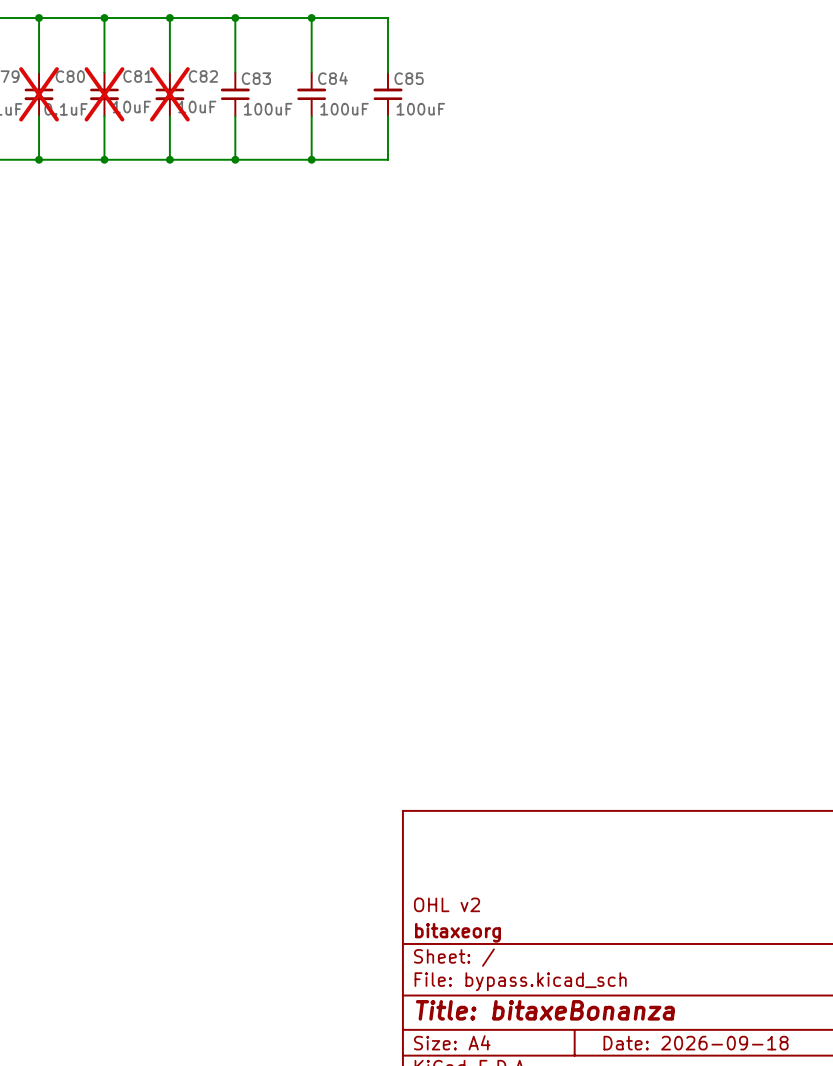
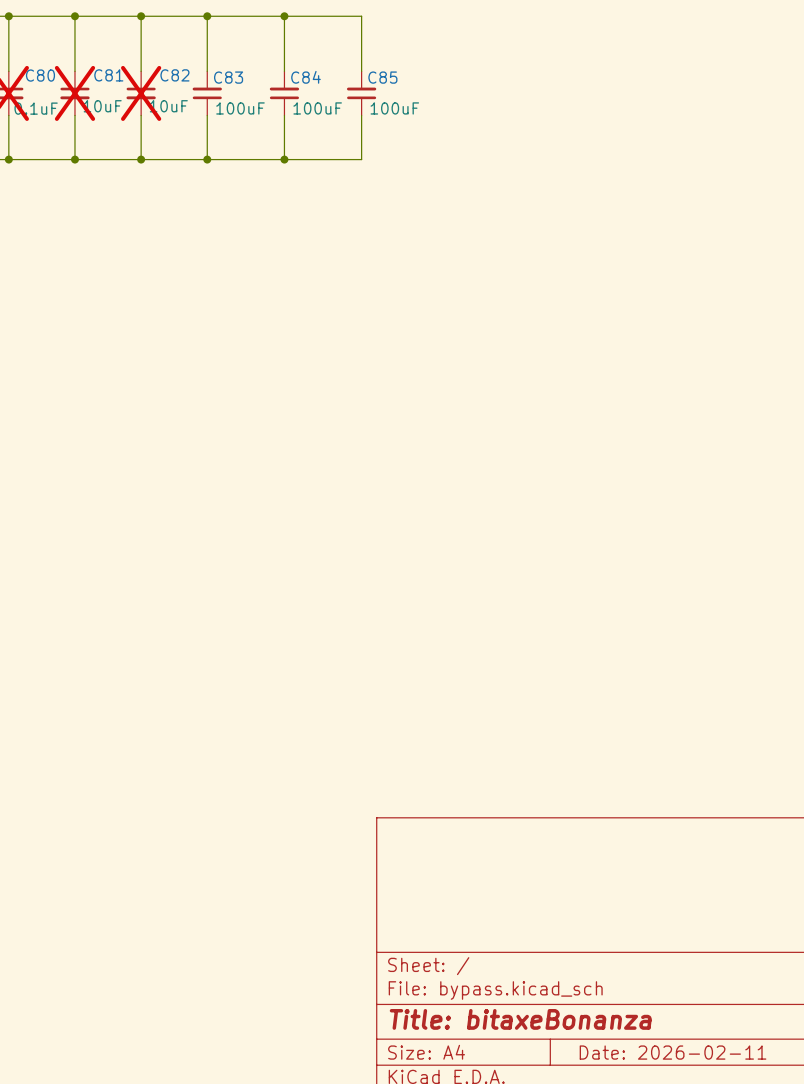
title block: OHL v2 (447, 904) -> none
title block: bitaxeorg (457, 932) -> none
title block: Date: 2026-09-18 (696, 1043) -> Date: 2026-02-11 (673, 1052)

